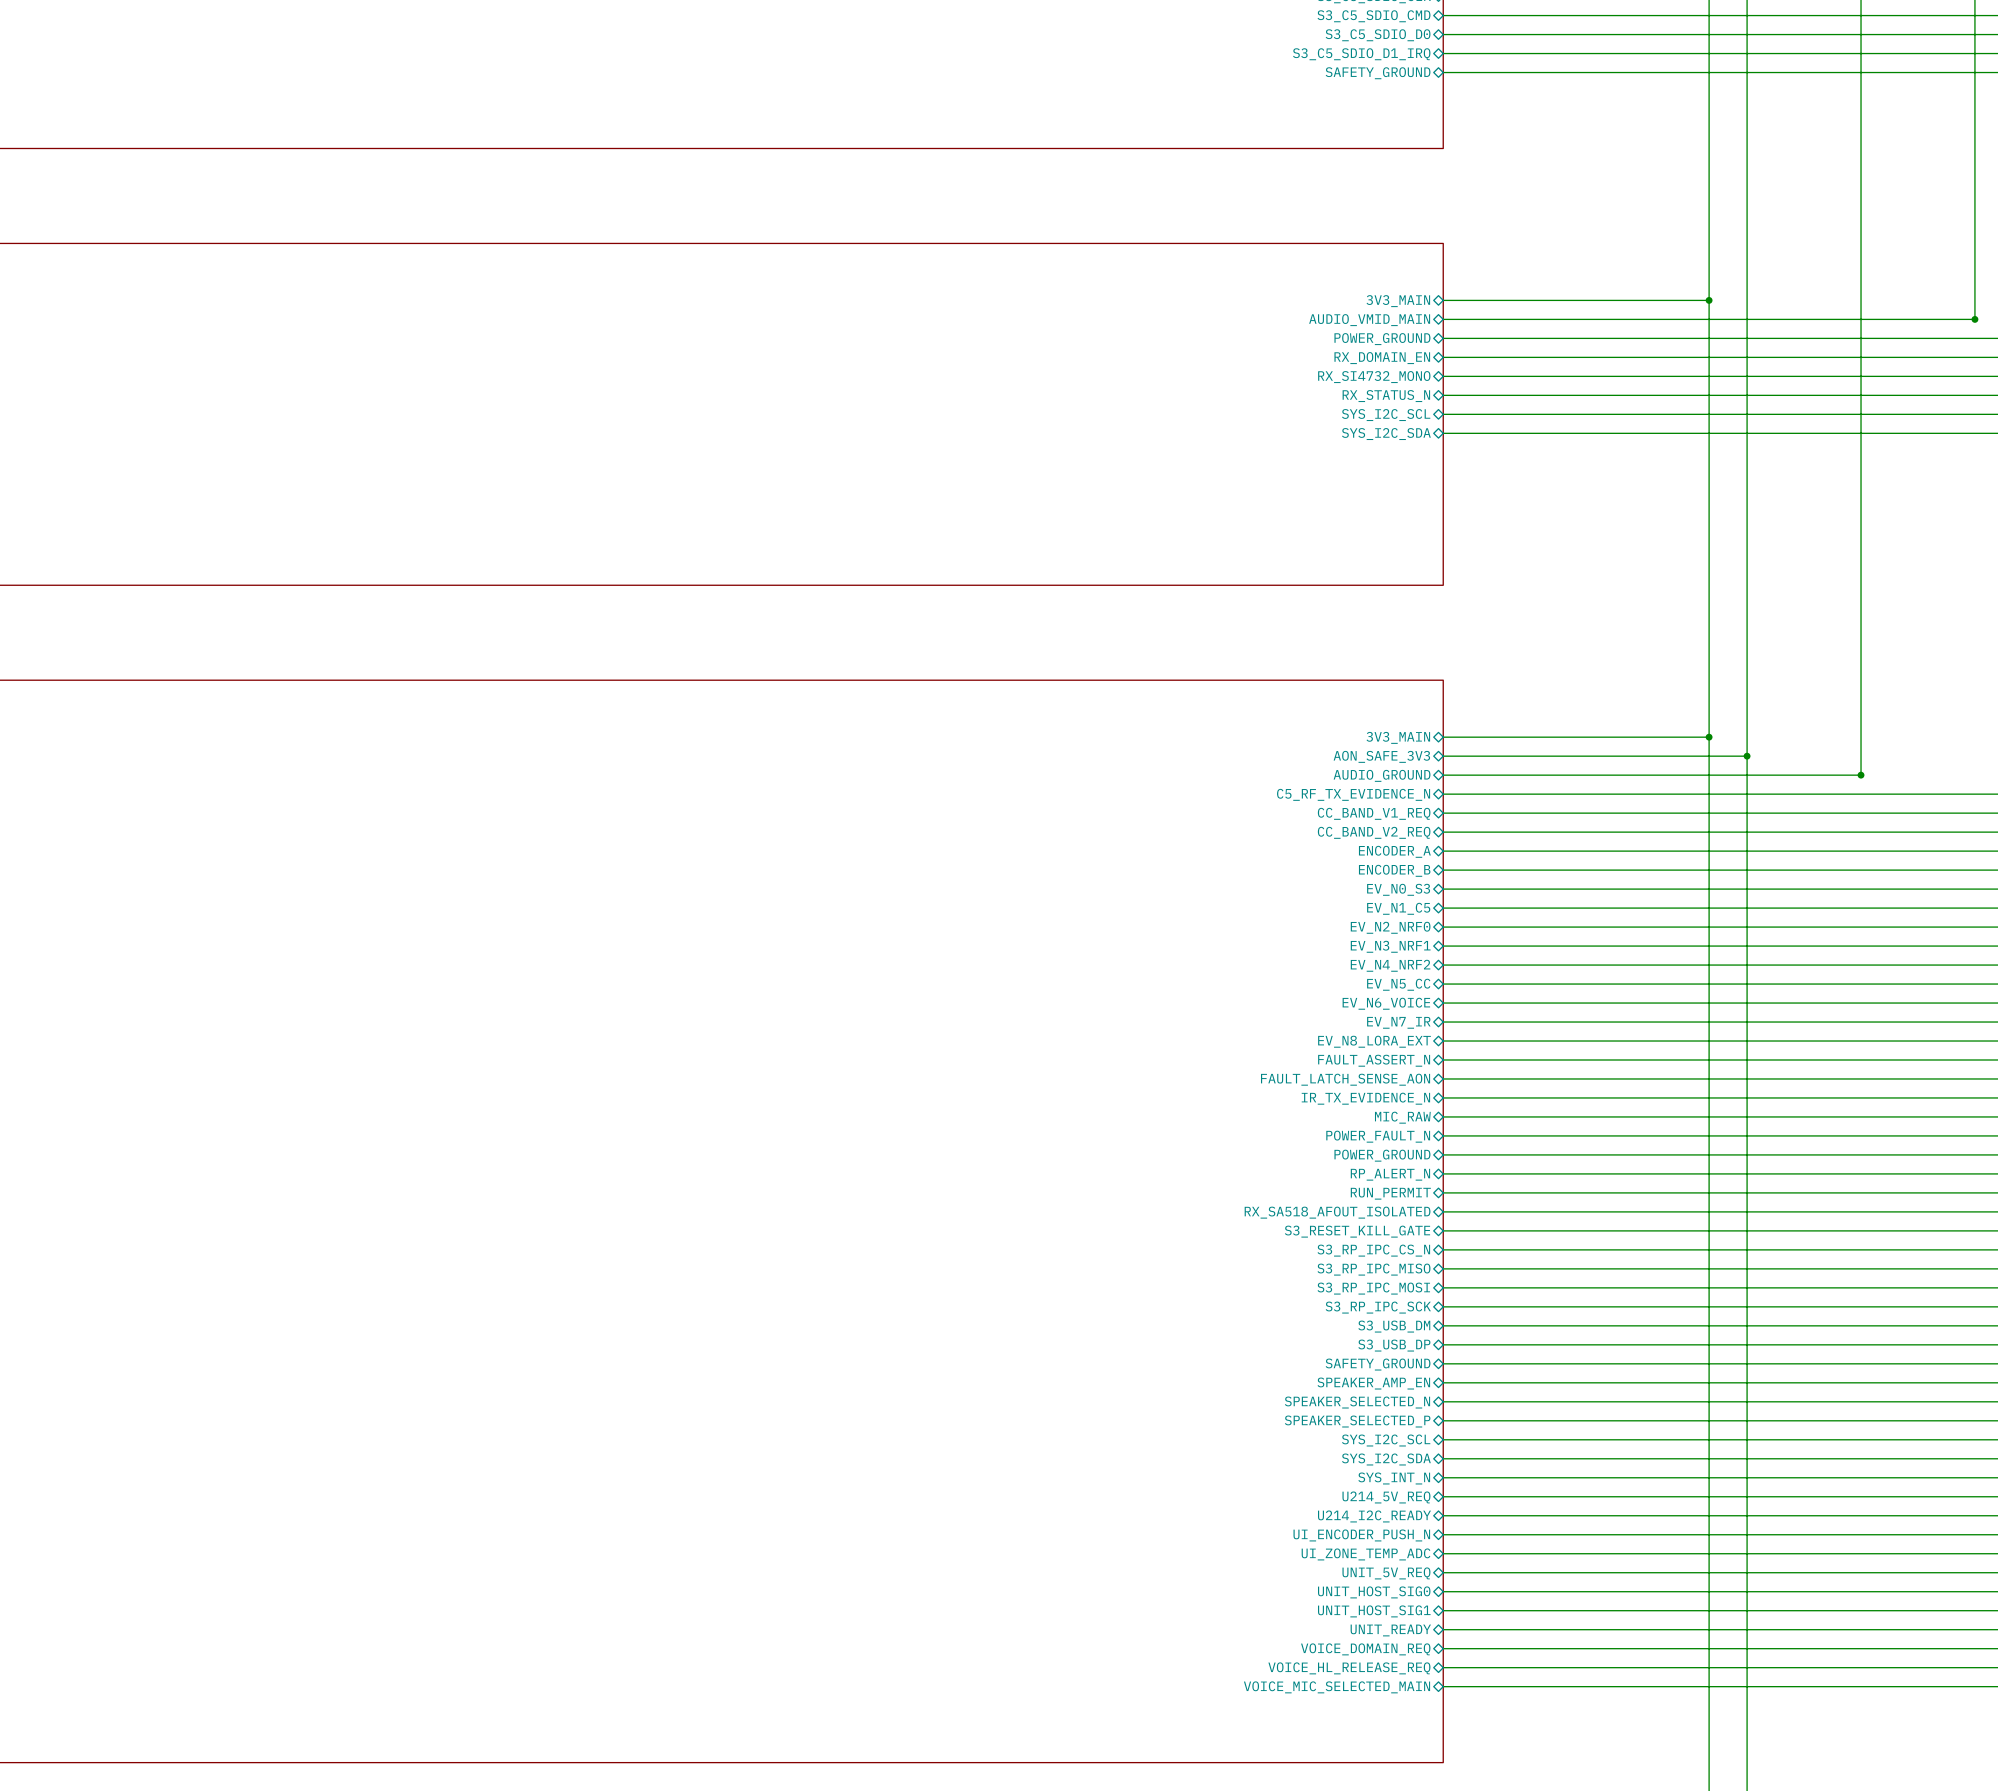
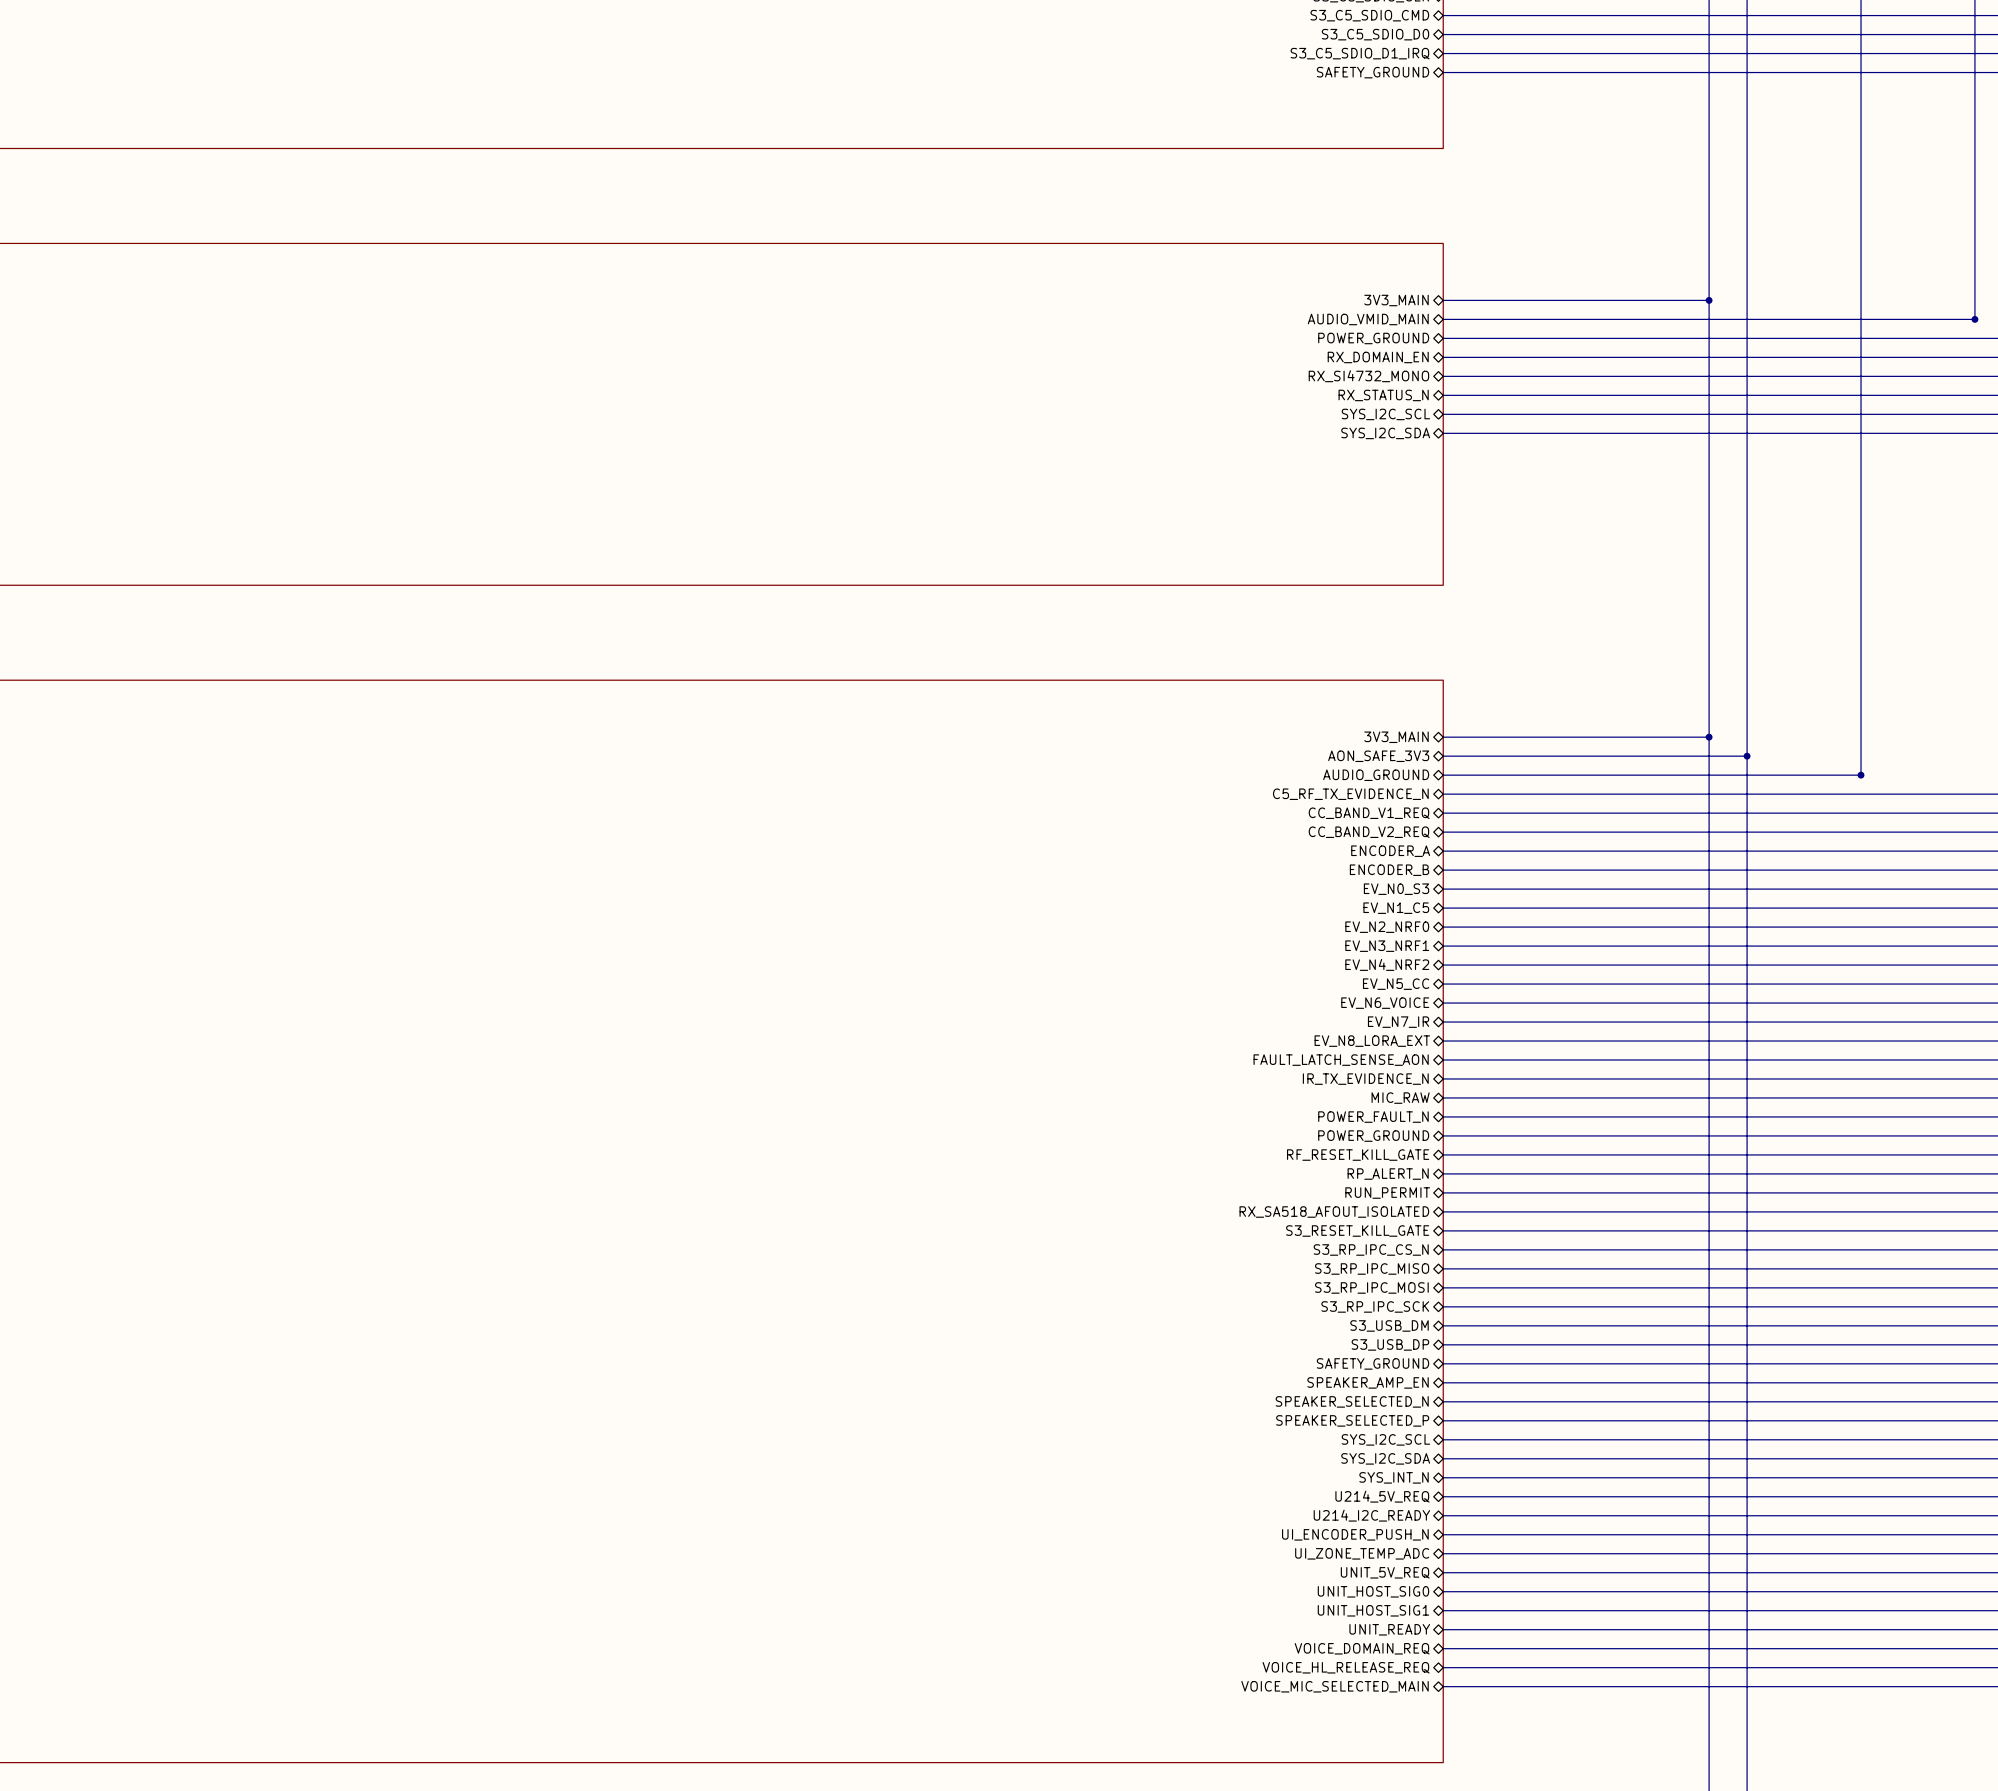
sheet pin: FAULT_ASSERT_N (1374, 1060) -> FAULT_LATCH_SENSE_AON (1341, 1060)
sheet pin: FAULT_LATCH_SENSE_AON (1345, 1079) -> IR_TX_EVIDENCE_N (1365, 1079)
sheet pin: IR_TX_EVIDENCE_N (1365, 1098) -> MIC_RAW (1400, 1098)
sheet pin: MIC_RAW (1402, 1117) -> POWER_FAULT_N (1373, 1117)
sheet pin: POWER_FAULT_N (1378, 1136) -> POWER_GROUND (1373, 1136)
sheet pin: POWER_GROUND (1382, 1155) -> RF_RESET_KILL_GATE (1358, 1155)

